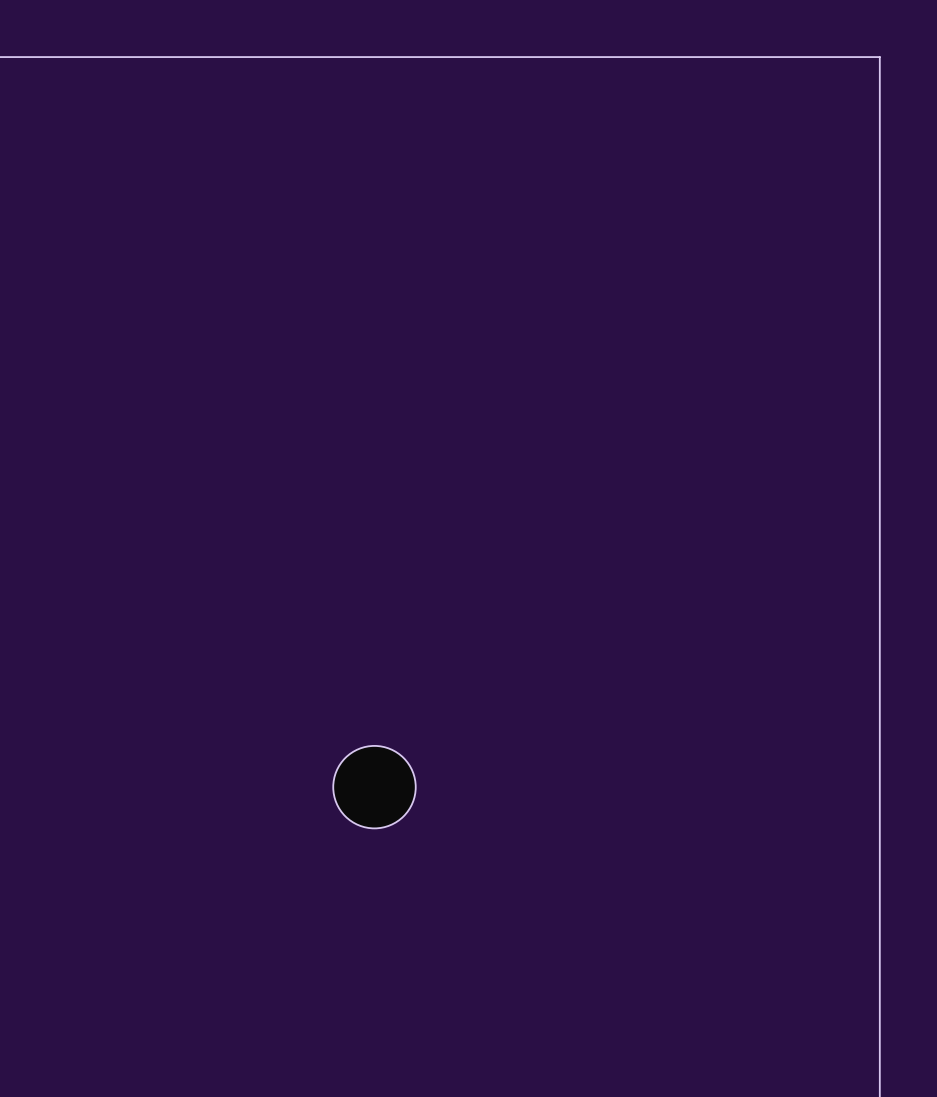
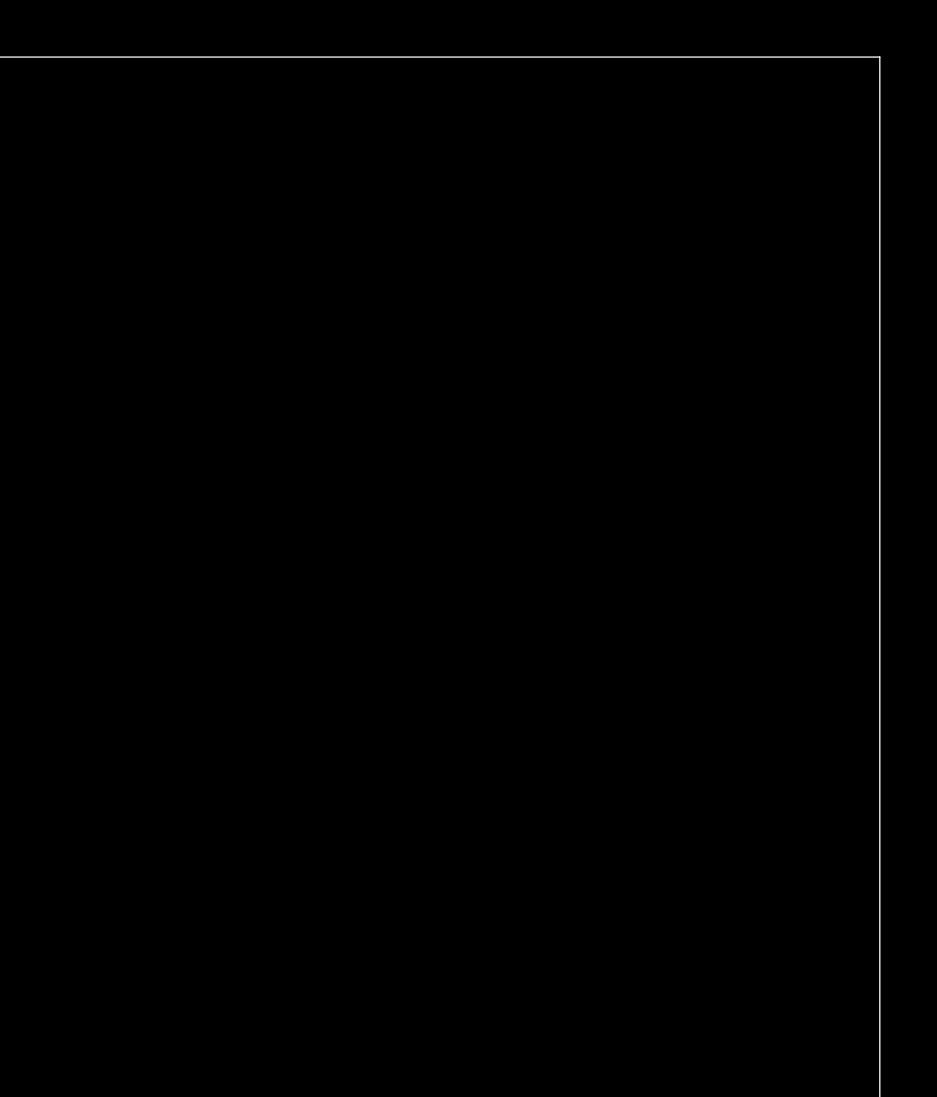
hole: (374, 787) -> none

